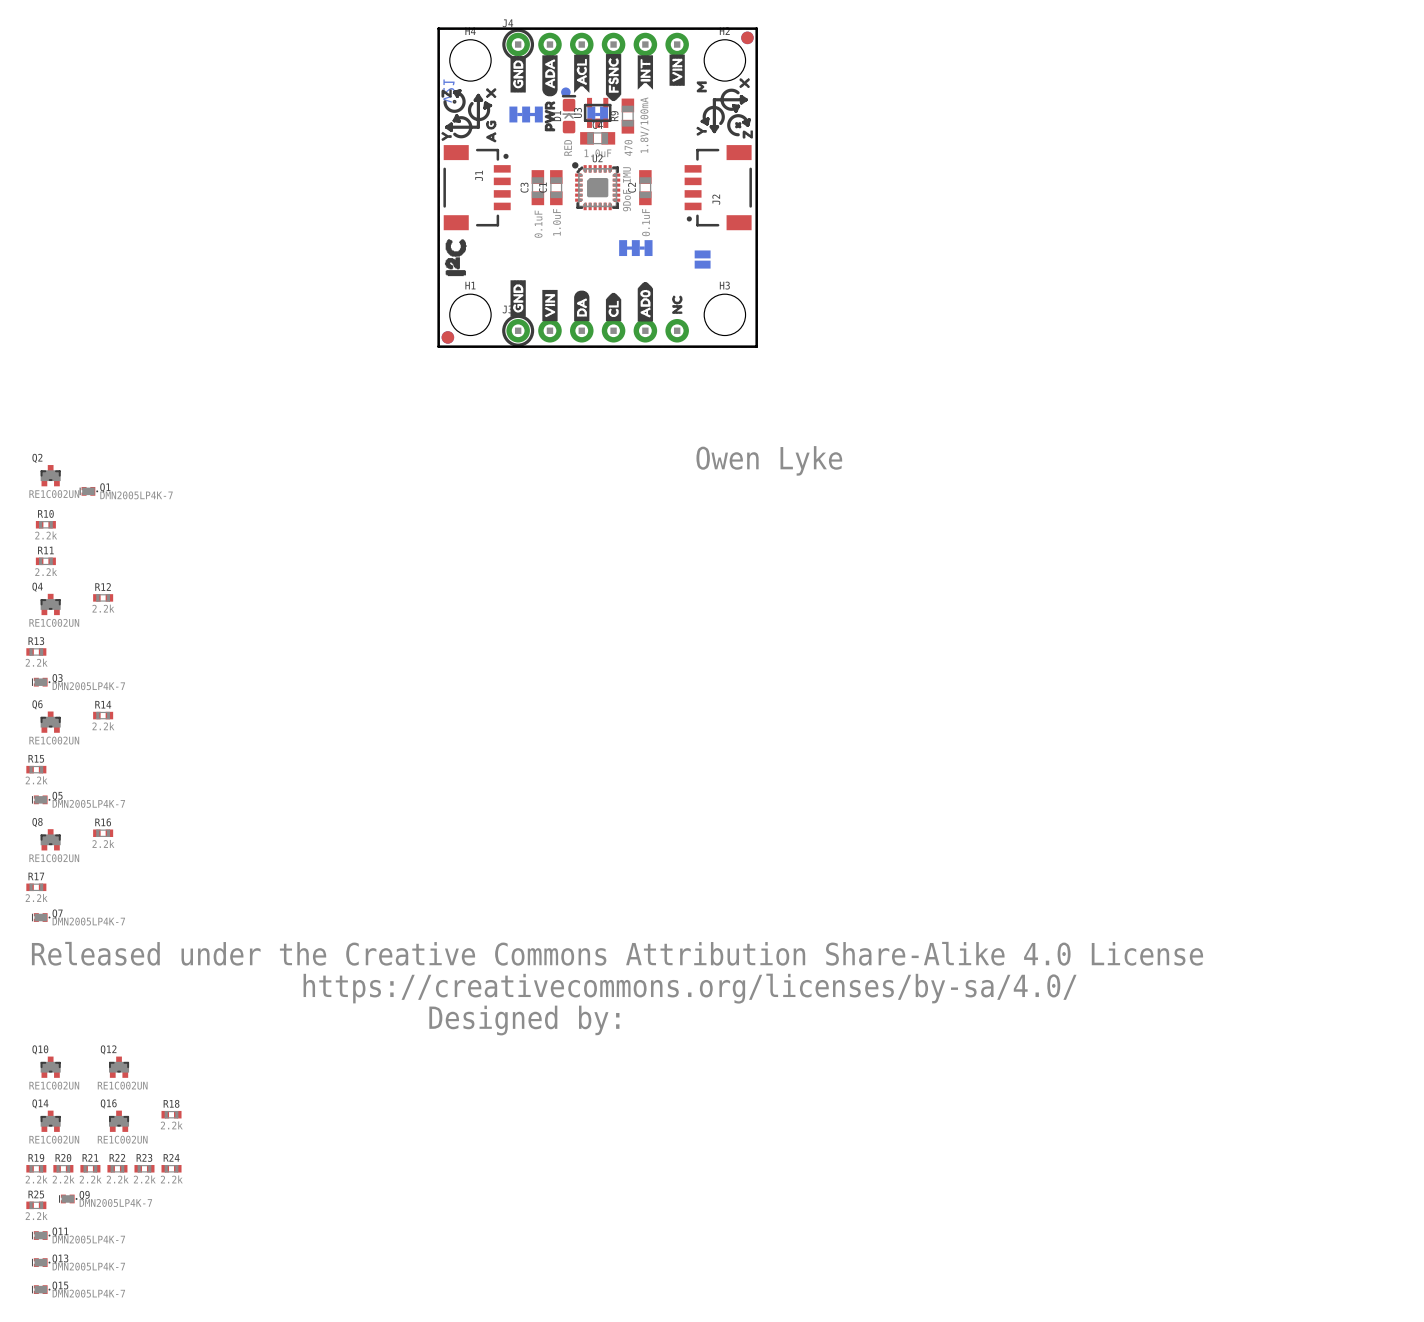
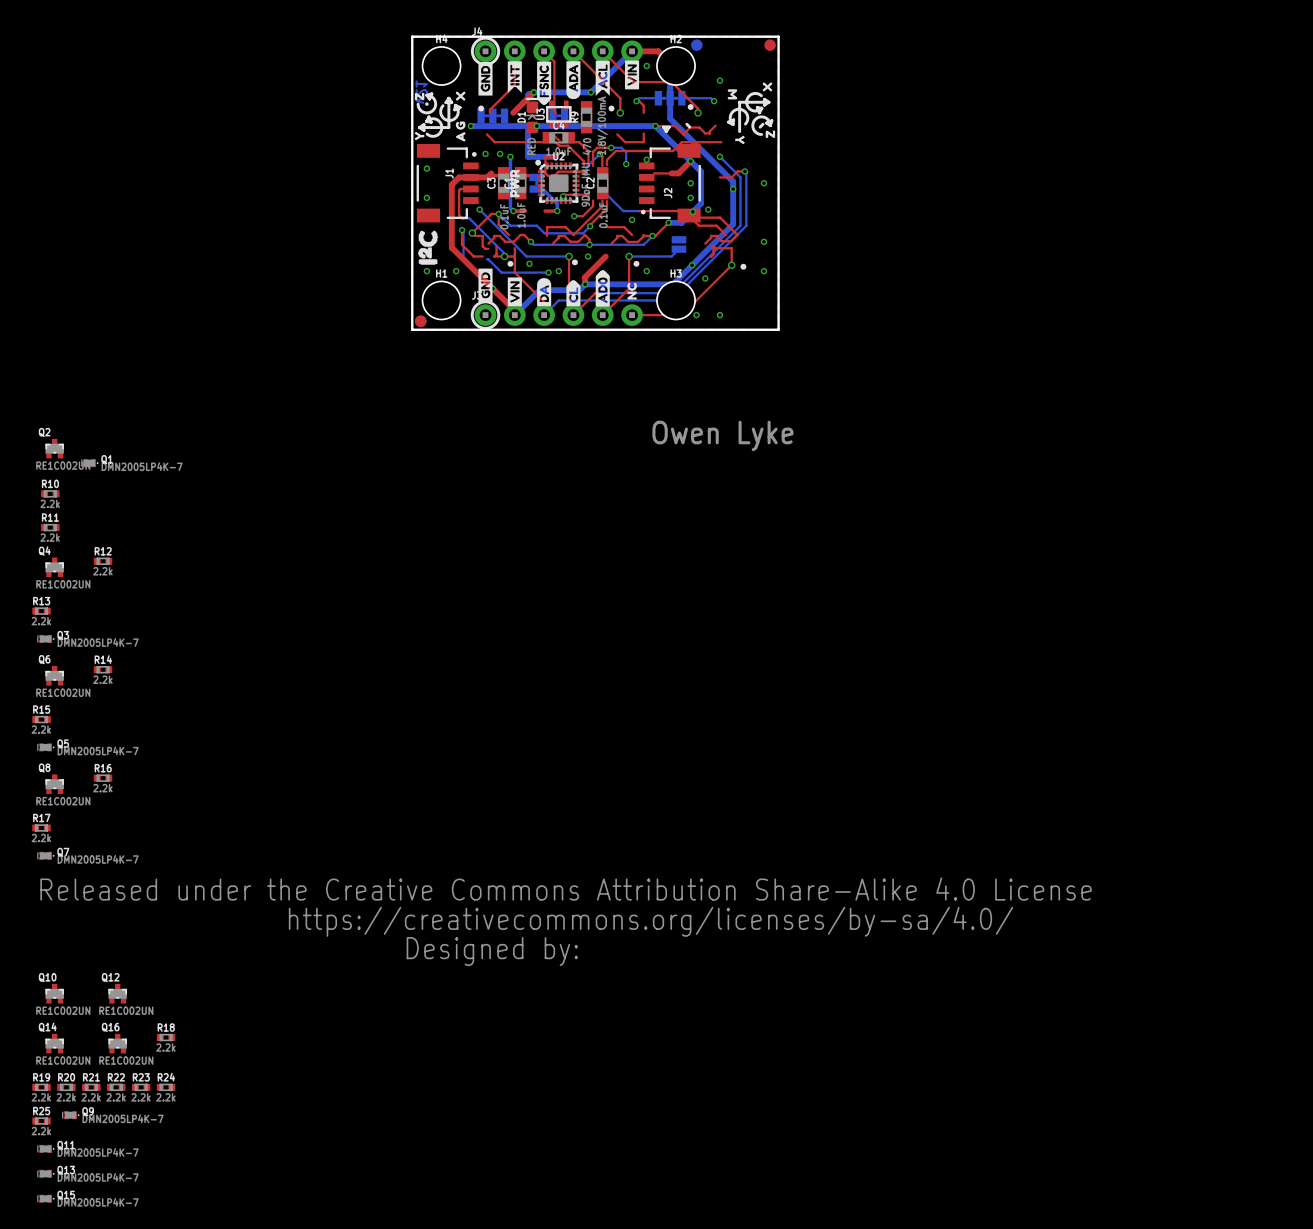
board edge: (756, 28) (756, 346) -> (705, 36) (778, 36) (778, 329) (705, 329)
part position: (747, 37) -> (770, 45)
top track: none -> (514, 51) (514, 85) (489, 109) (489, 112)
top track: none -> (544, 51) (554, 61) (555, 112)
top track: none -> (573, 51) (620, 98) (620, 112)
top track: none -> (602, 51) (633, 82) (671, 82) (698, 108) (698, 112)
top track: none -> (632, 51) (658, 51) (670, 63)
bottom track: none -> (632, 51) (591, 92) (533, 92)
bottom track: none -> (670, 63) (670, 118) (733, 181) (733, 224) (673, 284) (585, 284) (579, 290) (539, 290) (514, 315)
via: none -> (646, 65)
drawing position: (645, 72) -> (514, 77)
drawing position: (581, 73) -> (602, 78)
drawing position: (549, 75) -> (573, 80)
via: none -> (719, 80)
drawing position: (613, 77) -> (544, 83)
drawing: [696, 81, 707, 93] -> none
drawing position: (744, 83) -> (767, 86)
drawing: none -> [727, 89, 738, 100]
top track: none -> (533, 92) (513, 112)
via: none -> (533, 92)
via: none -> (591, 92)
line: (738, 92) (732, 90) (727, 91) (723, 94) (722, 100) (724, 105) (728, 108) (733, 109) (738, 106) -> (761, 95) (751, 94) (746, 102) (752, 110) (761, 108)
bottom track: none -> (658, 98) (639, 98) (636, 101)
bottom track: none -> (681, 98) (711, 98) (714, 101)
top track: none -> (636, 101) (643, 105) (643, 112)
via: none -> (636, 101)
via: none -> (714, 101)
line: (746, 99) (741, 96) (741, 102) (746, 99) -> (768, 102) (764, 99) (764, 105) (768, 102)
line: (746, 99) (714, 99) (714, 131) -> (768, 102) (739, 102) (739, 131)
drawing: none -> [687, 104, 694, 110]
drawing: none -> [478, 105, 485, 112]
drawing: none -> [608, 105, 615, 112]
line: (738, 106) (733, 105) (735, 111) (738, 106) -> (761, 108) (757, 107) (759, 112) (761, 108)
part: none -> (620, 112)
part: none -> (698, 112)
drawing position: (549, 116) -> (514, 183)
line: (707, 123) (707, 118) (702, 121) (707, 123) -> (733, 124) (733, 119) (728, 122) (733, 124)
line: (720, 123) (723, 117) (722, 112) (719, 109) (713, 107) (707, 109) (704, 113) (704, 118) (707, 123) -> (745, 124) (747, 114) (738, 109) (730, 114) (733, 124)
line: (739, 123) (736, 126) -> (763, 124) (760, 127)
bottom track: none -> (470, 126) (655, 126) (700, 171) (700, 203) (681, 222) (668, 222)
via: none -> (470, 126)
bottom track: none -> (528, 126) (528, 156) (555, 156)
via: none -> (536, 126)
via: none -> (655, 126)
line: (747, 125) (743, 122) (749, 119) (747, 125) -> (770, 125) (766, 123) (771, 120) (770, 125)
line: (747, 125) (746, 120) (741, 116) (736, 115) (731, 118) (728, 123) (729, 128) (732, 132) (738, 134) -> (770, 125) (764, 117) (755, 119) (753, 129) (761, 134)
top track: none -> (715, 125) (709, 133) (705, 133) (699, 127) (690, 127) (683, 134) (675, 126) (655, 126)
drawing: [696, 126, 707, 136] -> none
top track: none -> (643, 133) (643, 142) (625, 142) (617, 134)
top track: none -> (486, 134) (494, 142) (555, 142) (559, 145) (568, 145) (583, 161) (583, 165)
top track: none -> (552, 134) (560, 142) (579, 142) (588, 151) (588, 165)
drawing position: (747, 134) -> (770, 134)
drawing: none -> [735, 135, 745, 145]
top track: none -> (721, 142) (681, 142) (673, 150) (615, 150) (606, 159) (606, 165)
top track: none -> (611, 147) (597, 147) (593, 151) (593, 165)
bottom track: none -> (611, 147) (621, 147) (626, 152) (626, 164)
via: none -> (611, 147)
via: none -> (485, 153)
via: none -> (500, 153)
top track: none -> (599, 153) (602, 156) (602, 165)
bottom track: none -> (599, 153) (586, 167) (586, 174)
via: none -> (599, 153)
bottom track: none -> (510, 156) (510, 208) (513, 211)
via: none -> (510, 156)
top track: none -> (555, 156) (545, 156) (545, 173) (547, 175) (554, 175) (558, 171) (582, 171) (586, 174)
bottom track: none -> (719, 156) (740, 177) (740, 225) (673, 293) (598, 293)
via: none -> (719, 156)
via: none -> (646, 159)
top track: none -> (690, 161) (678, 173) (654, 173)
via: none -> (690, 161)
via: none -> (626, 164)
via: none -> (426, 168)
top track: none -> (744, 171) (737, 171) (731, 177) (719, 177)
bottom track: none -> (744, 171) (746, 225) (671, 300) (558, 300) (544, 315)
via: none -> (744, 171)
top track: none -> (528, 175) (493, 175) (491, 173) (487, 177) (459, 177) (451, 184) (451, 247) (514, 310) (514, 315)
part: none -> (536, 183)
via: none -> (690, 183)
via: none -> (763, 183)
top track: none -> (470, 188) (459, 190) (459, 215) (463, 218)
bottom track: none -> (536, 189) (542, 189) (557, 203) (557, 211)
via: none -> (733, 189)
bottom track: none -> (604, 192) (623, 211) (639, 211)
top track: none -> (563, 196) (588, 193) (588, 200)
via: none -> (563, 196)
via: none -> (426, 197)
via: none -> (690, 197)
top track: none -> (593, 200) (593, 206) (582, 216) (574, 216)
top track: none -> (602, 200) (602, 206) (573, 235) (565, 227) (547, 227) (547, 235)
top track: none -> (606, 201) (606, 208) (590, 226)
bottom track: none -> (479, 209) (526, 256) (569, 256)
via: none -> (479, 209)
via: none -> (708, 209)
top track: none -> (513, 211) (525, 211)
via: none -> (513, 211)
top track: none -> (545, 211) (557, 211)
via: none -> (557, 211)
top track: none -> (639, 211) (684, 211) (698, 225) (716, 225) (725, 235)
top track: none -> (692, 211) (698, 217) (720, 217) (737, 235) (731, 241) (721, 241) (716, 235) (711, 235) (705, 243)
via: none -> (692, 211)
bottom track: none -> (498, 214) (510, 225) (536, 225) (544, 233) (583, 233) (590, 226)
via: none -> (498, 214)
via: none -> (574, 216)
bottom track: none -> (463, 218) (469, 218) (504, 253) (504, 256)
via: none -> (632, 219)
top track: none -> (668, 222) (655, 235) (643, 235)
via: none -> (668, 222)
via: none -> (590, 226)
top track: none -> (605, 227) (624, 227) (632, 235)
top track: none -> (462, 230) (462, 244) (473, 256) (482, 256)
bottom track: none -> (462, 230) (463, 259)
via: none -> (462, 230)
part: none -> (472, 233)
top track: none -> (509, 235) (498, 224) (498, 214) (491, 214) (472, 233) (475, 235) (482, 235) (482, 246) (488, 248)
top track: none -> (643, 235) (637, 241) (628, 241) (622, 235) (617, 235) (611, 243)
bottom track: none -> (652, 235) (643, 244) (533, 244) (530, 241)
via: none -> (652, 235)
part position: (635, 248) -> (670, 98)
top track: none -> (530, 241) (524, 235) (520, 235) (513, 241) (505, 241) (499, 235) (494, 235) (488, 243)
via: none -> (530, 241)
via: none -> (763, 241)
top track: none -> (552, 243) (558, 235) (564, 235) (570, 241) (578, 241) (585, 235) (589, 239) (589, 244)
via: none -> (589, 244)
top track: none -> (496, 246) (496, 254) (494, 256) (514, 256)
top track: none -> (514, 248) (514, 272) (544, 301) (544, 315)
part position: (702, 259) -> (678, 244)
bottom track: none -> (678, 249) (671, 256) (629, 256)
part: none -> (504, 256)
top track: none -> (569, 256) (569, 310) (573, 315) (595, 293) (598, 293)
part: none -> (569, 256)
via: none -> (588, 256)
top track: none -> (605, 256) (585, 277) (585, 284)
top track: none -> (629, 256) (629, 288) (602, 315)
part: none -> (629, 256)
top track: none -> (711, 256) (713, 254) (713, 246) (715, 248) (731, 248) (731, 265) (681, 315) (632, 315)
bottom track: none -> (486, 259) (501, 272) (548, 272)
drawing: none -> [571, 259, 578, 266]
drawing: none -> [507, 260, 514, 267]
drawing: none -> [633, 260, 640, 267]
via: none -> (529, 263)
drawing: none -> [740, 263, 747, 270]
via: none -> (692, 265)
part: none -> (731, 265)
via: none -> (426, 271)
via: none -> (456, 271)
via: none -> (558, 271)
via: none -> (646, 271)
via: none -> (763, 271)
via: none -> (548, 272)
via: none -> (705, 278)
via: none -> (585, 284)
via: none -> (492, 288)
via: none -> (696, 315)
via: none -> (719, 315)

